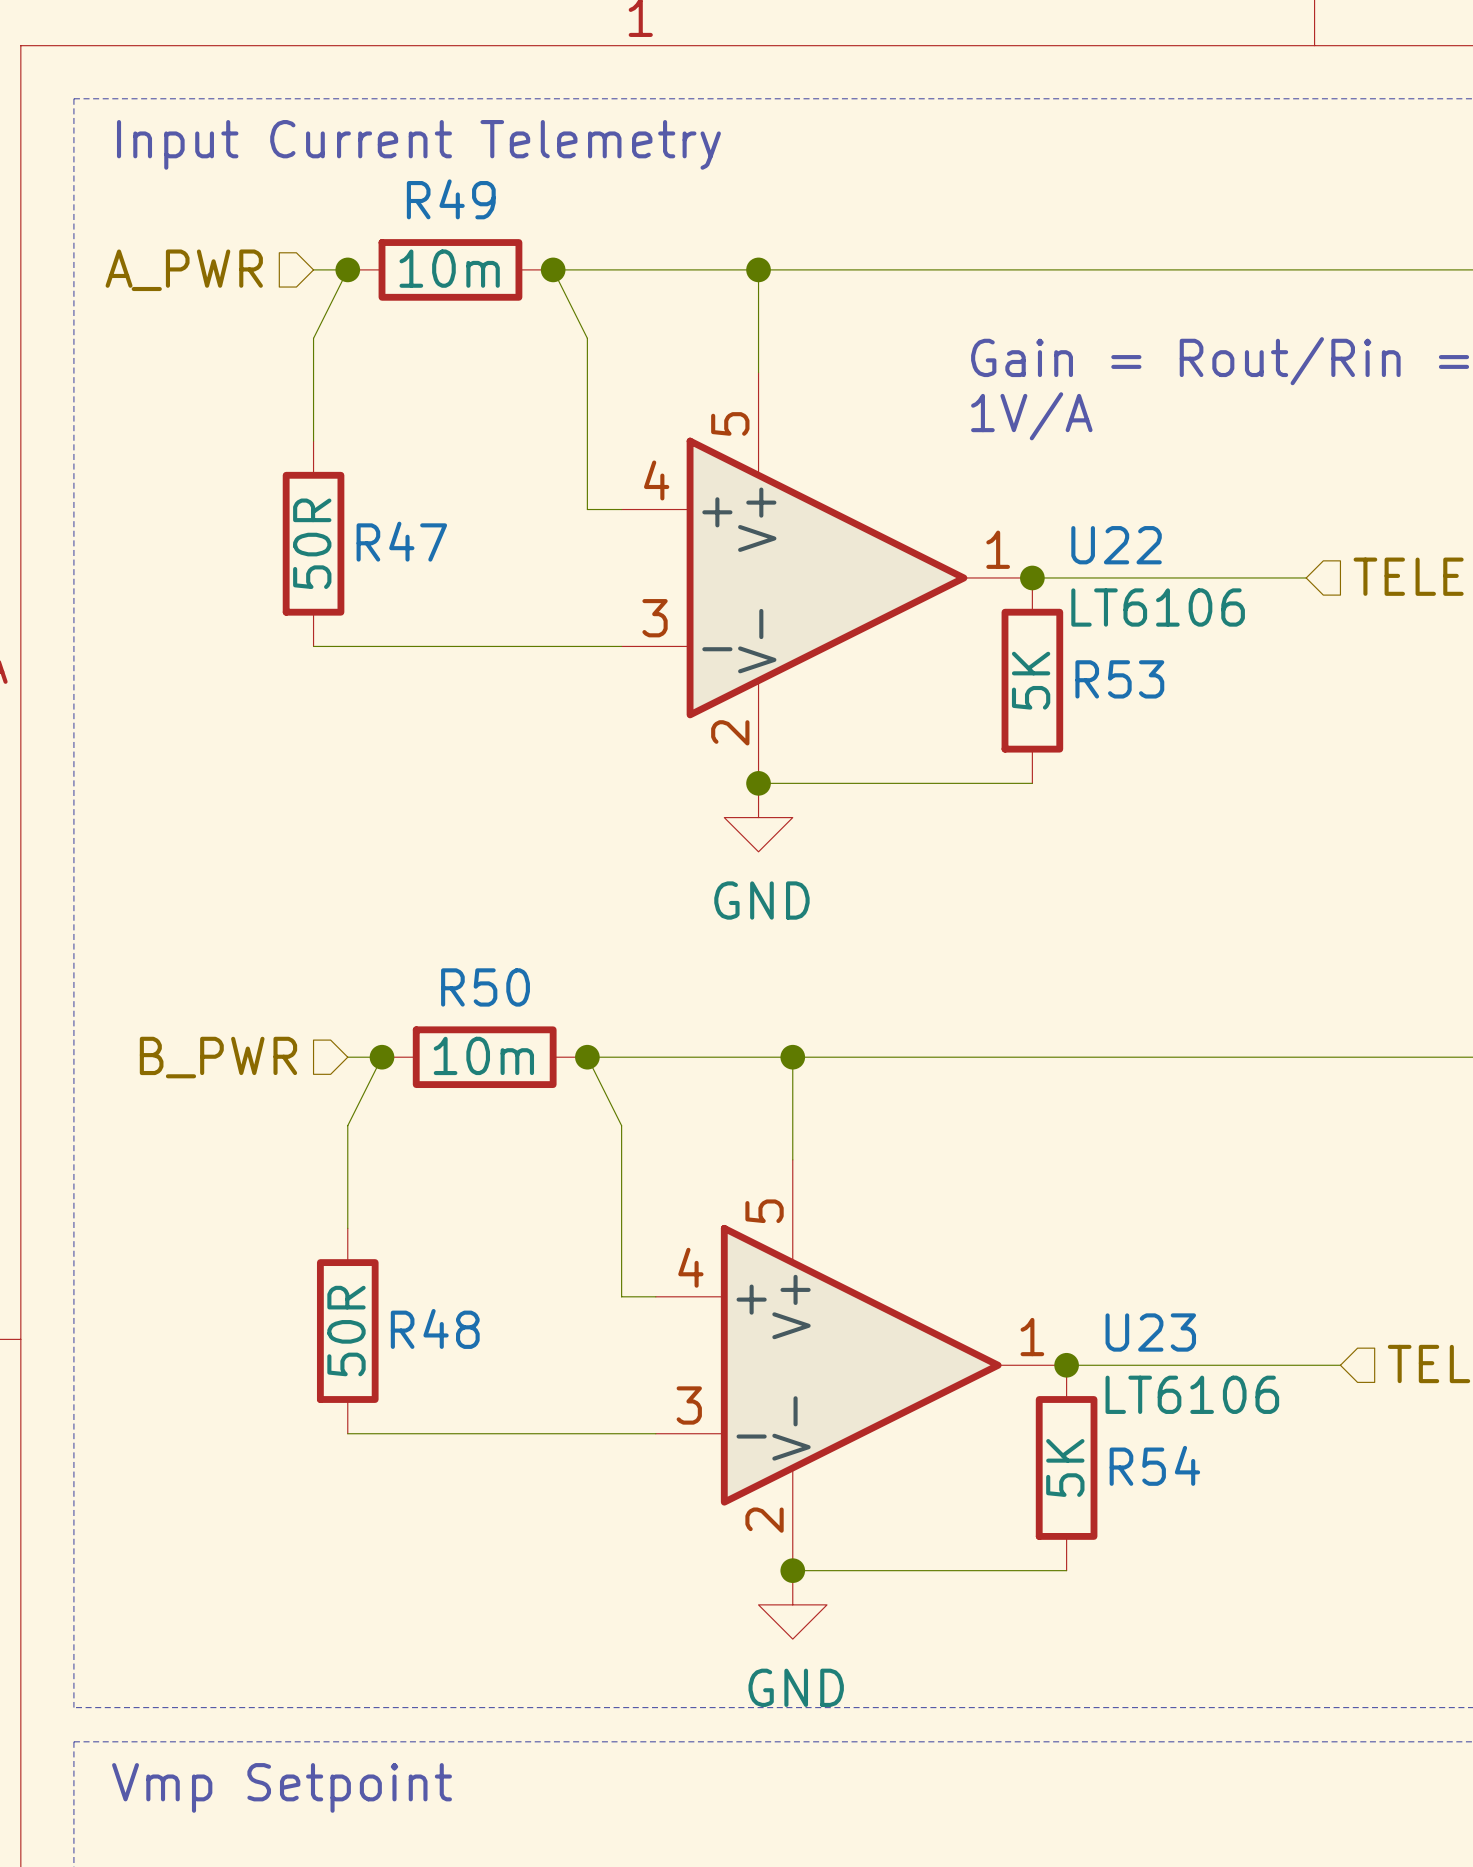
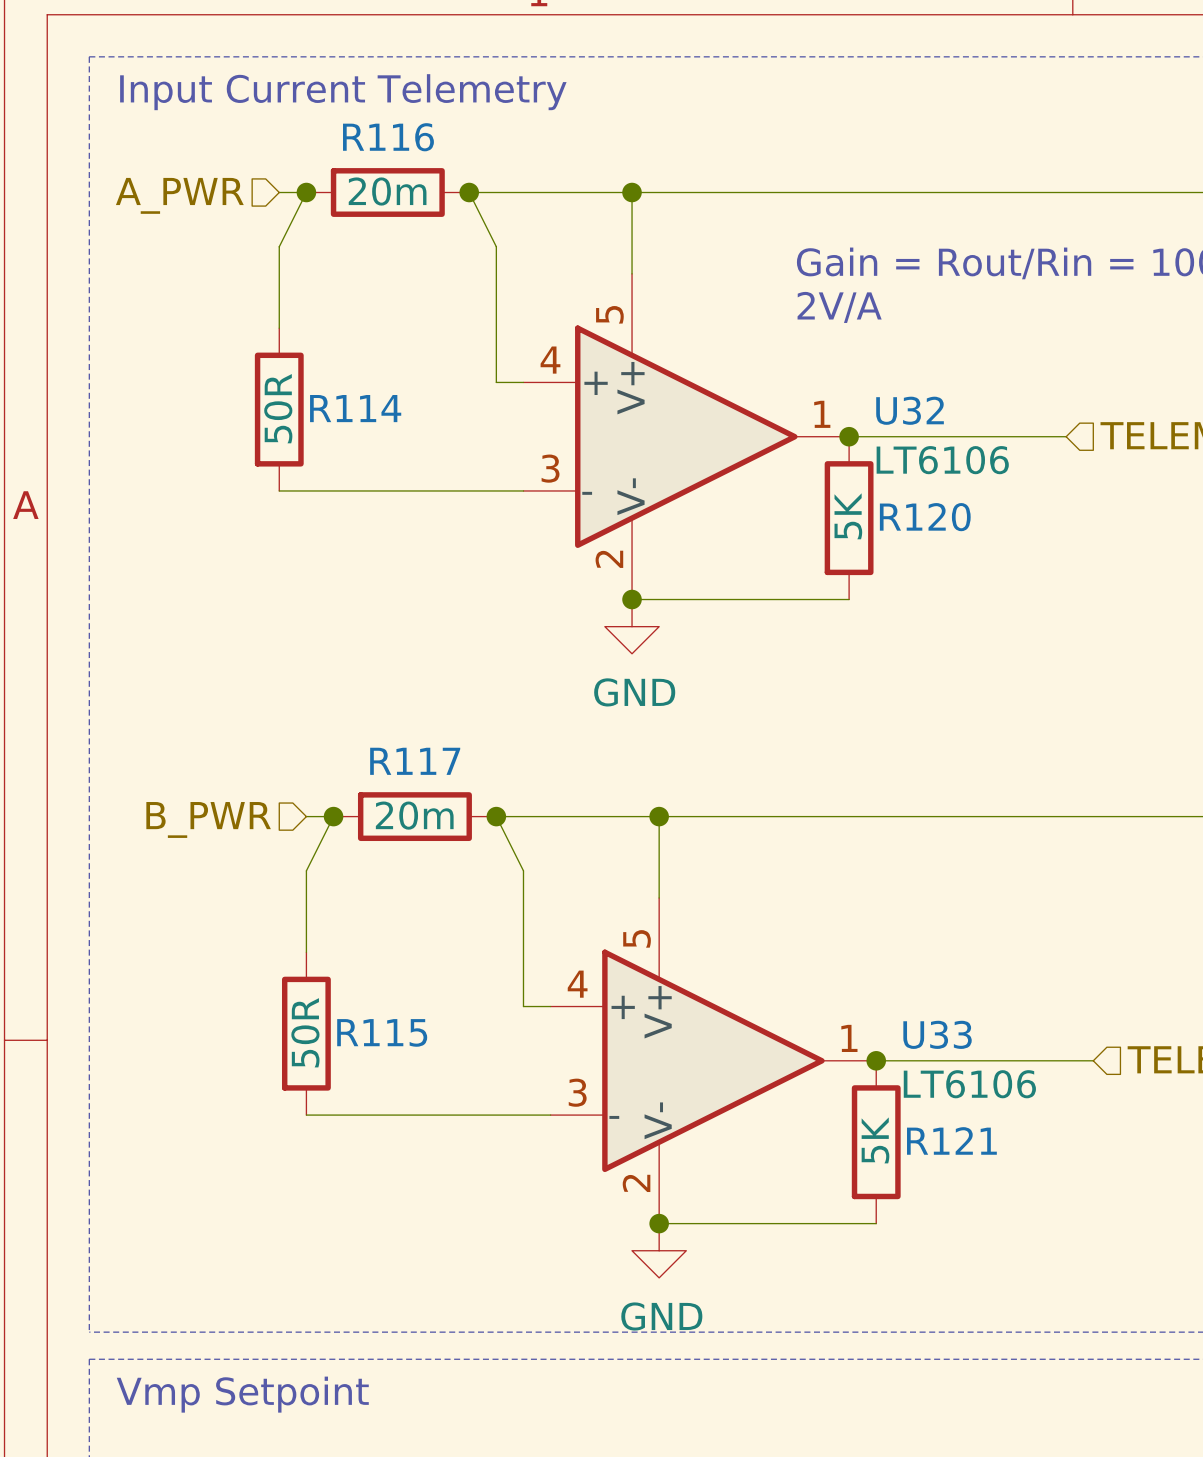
R49 name: R49 (451, 199) -> R116 (388, 137)
R49 value: 10m (449, 268) -> 20m (387, 191)
text: 1V/A (1031, 416) -> 2V/A (839, 307)
R47 name: R47 (401, 541) -> R114 (355, 408)
U22 name: U22 (1116, 545) -> U32 (910, 410)
R53 name: R53 (1119, 679) -> R120 (925, 517)
R50 name: R50 (485, 987) -> R117 (415, 761)
R50 value: 10m (483, 1055) -> 20m (414, 815)
R48 name: R48 (435, 1328) -> R115 (382, 1032)
U23 name: U23 (1150, 1332) -> U33 (937, 1034)
R54 name: R54 (1154, 1465) -> R121 (951, 1140)

